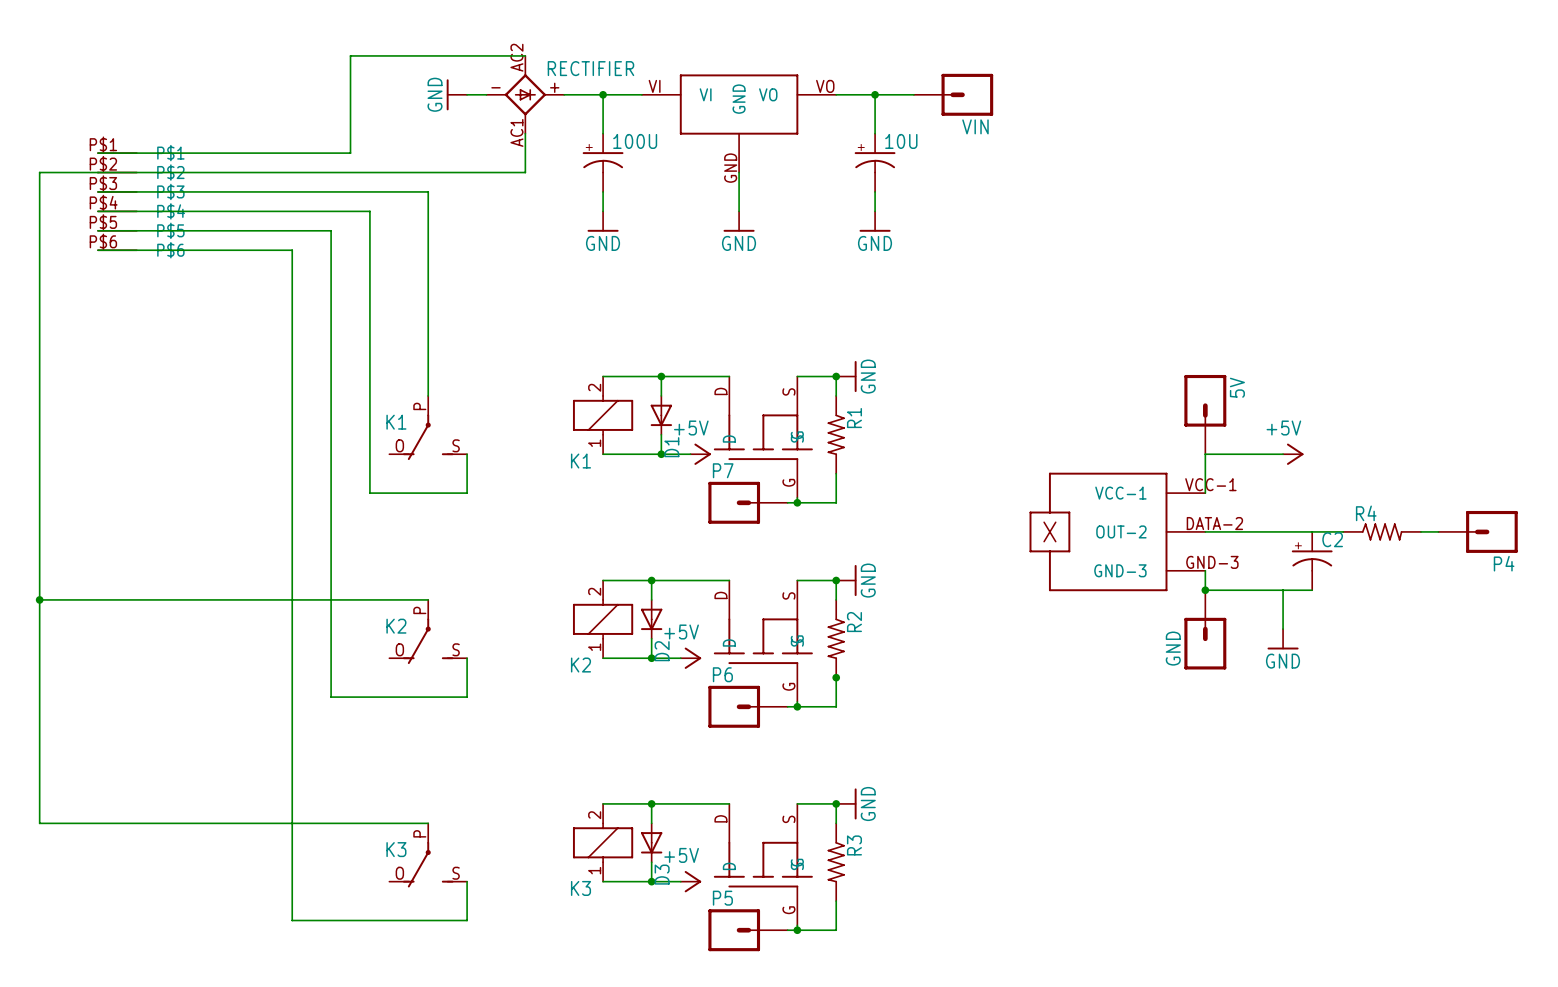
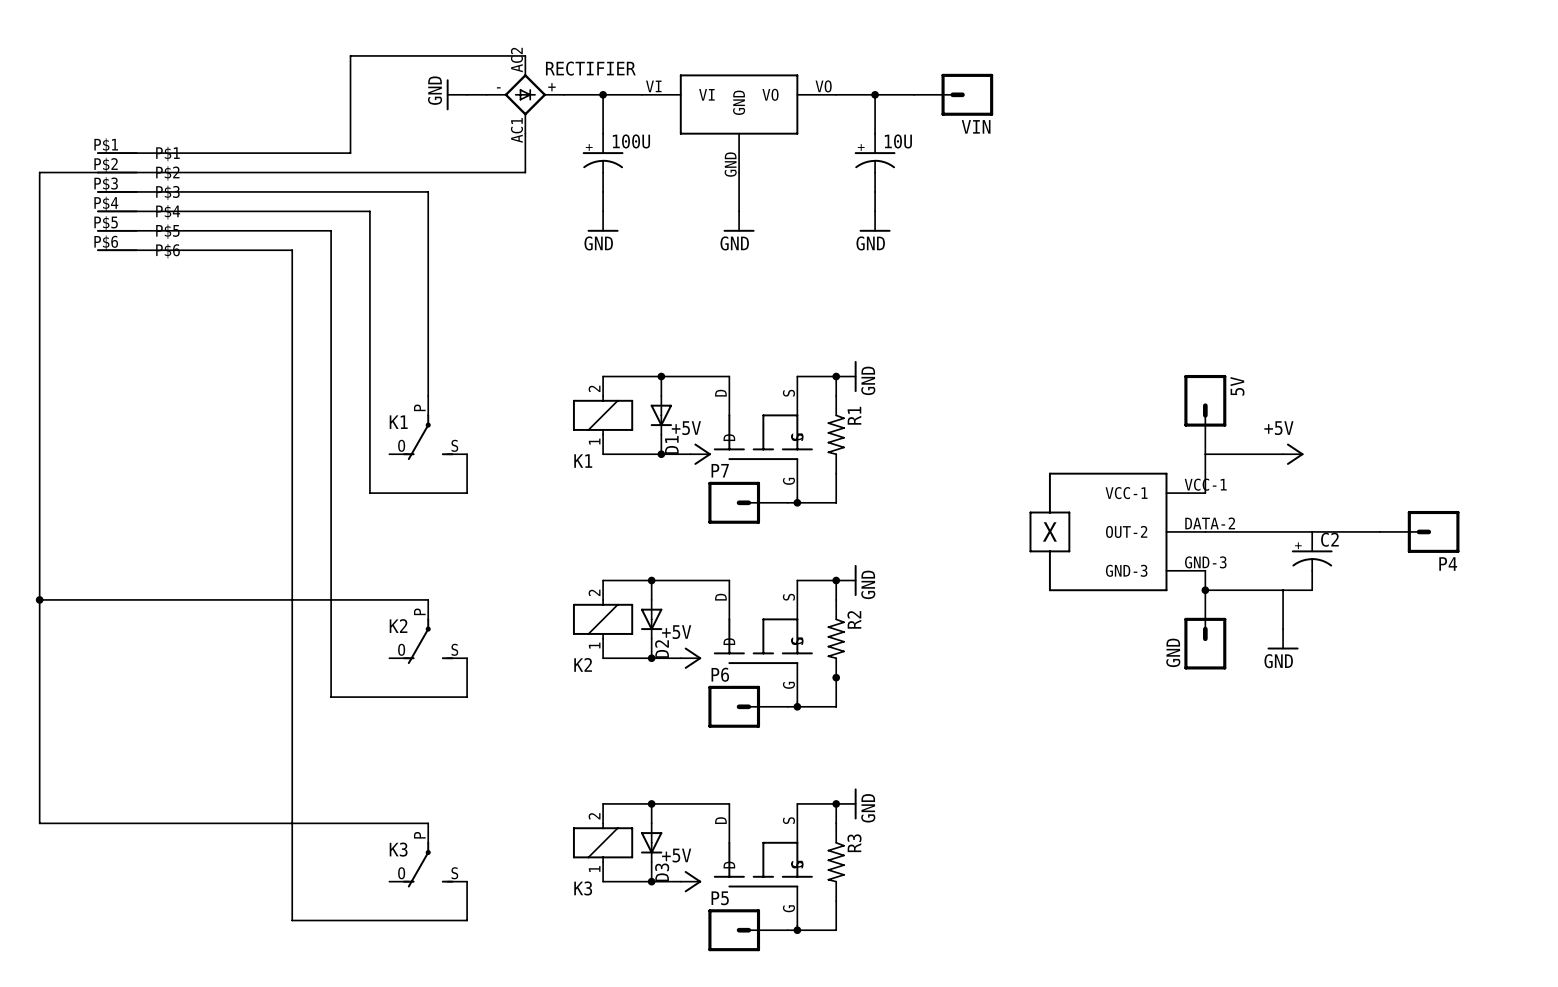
R4: (1382, 531) -> none
P4 position: (1478, 531) -> (1419, 531)

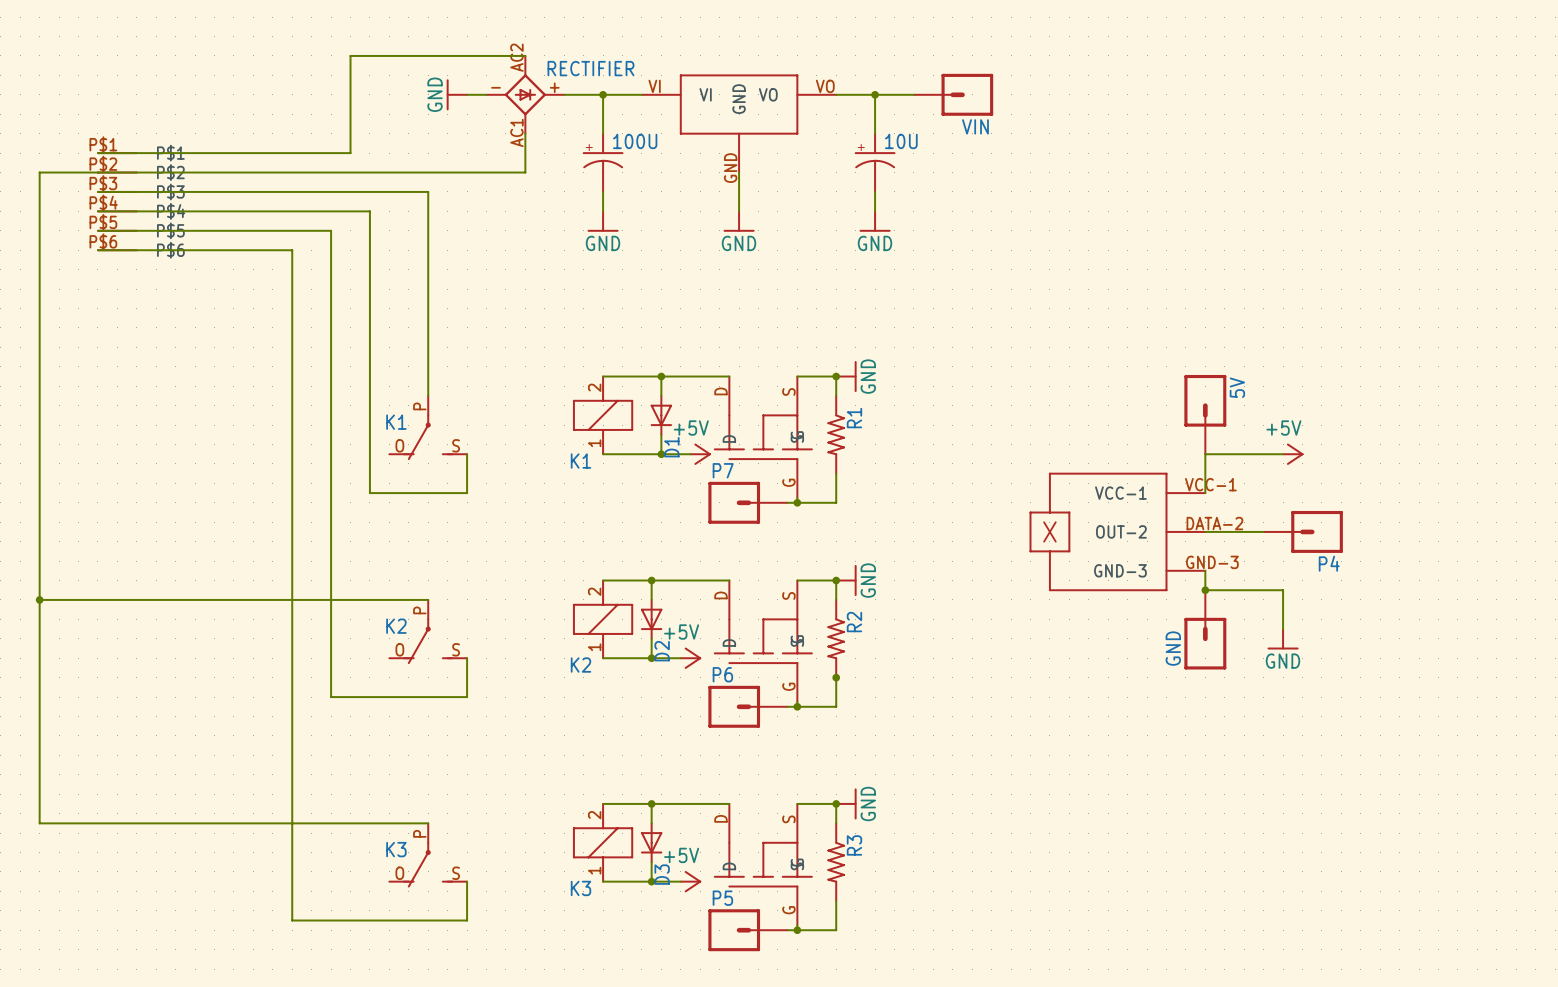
wire: (1263, 531) (1380, 531) -> none
P4 position: (1419, 531) -> (1303, 531)
C2: (1312, 561) -> none
wire: (1283, 590) (1312, 590) -> none

